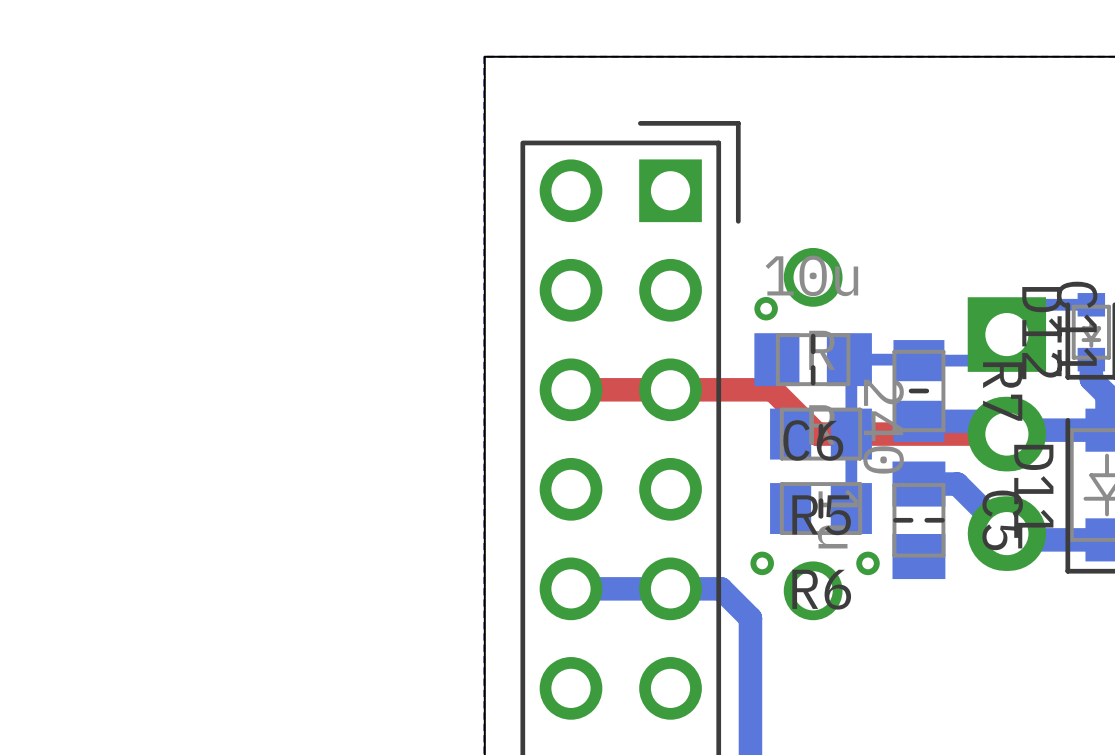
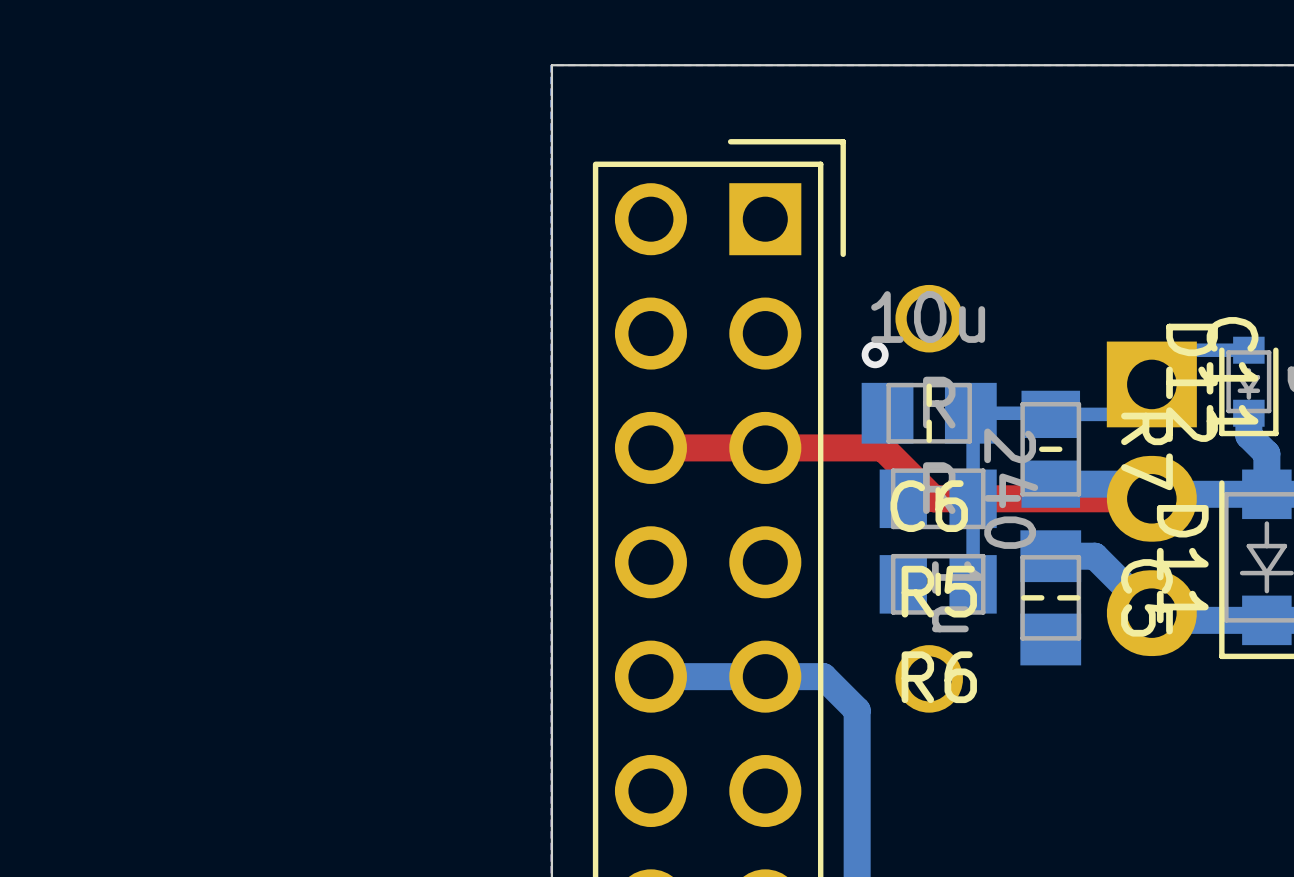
via: (762, 563) -> none
via: (868, 563) -> none

